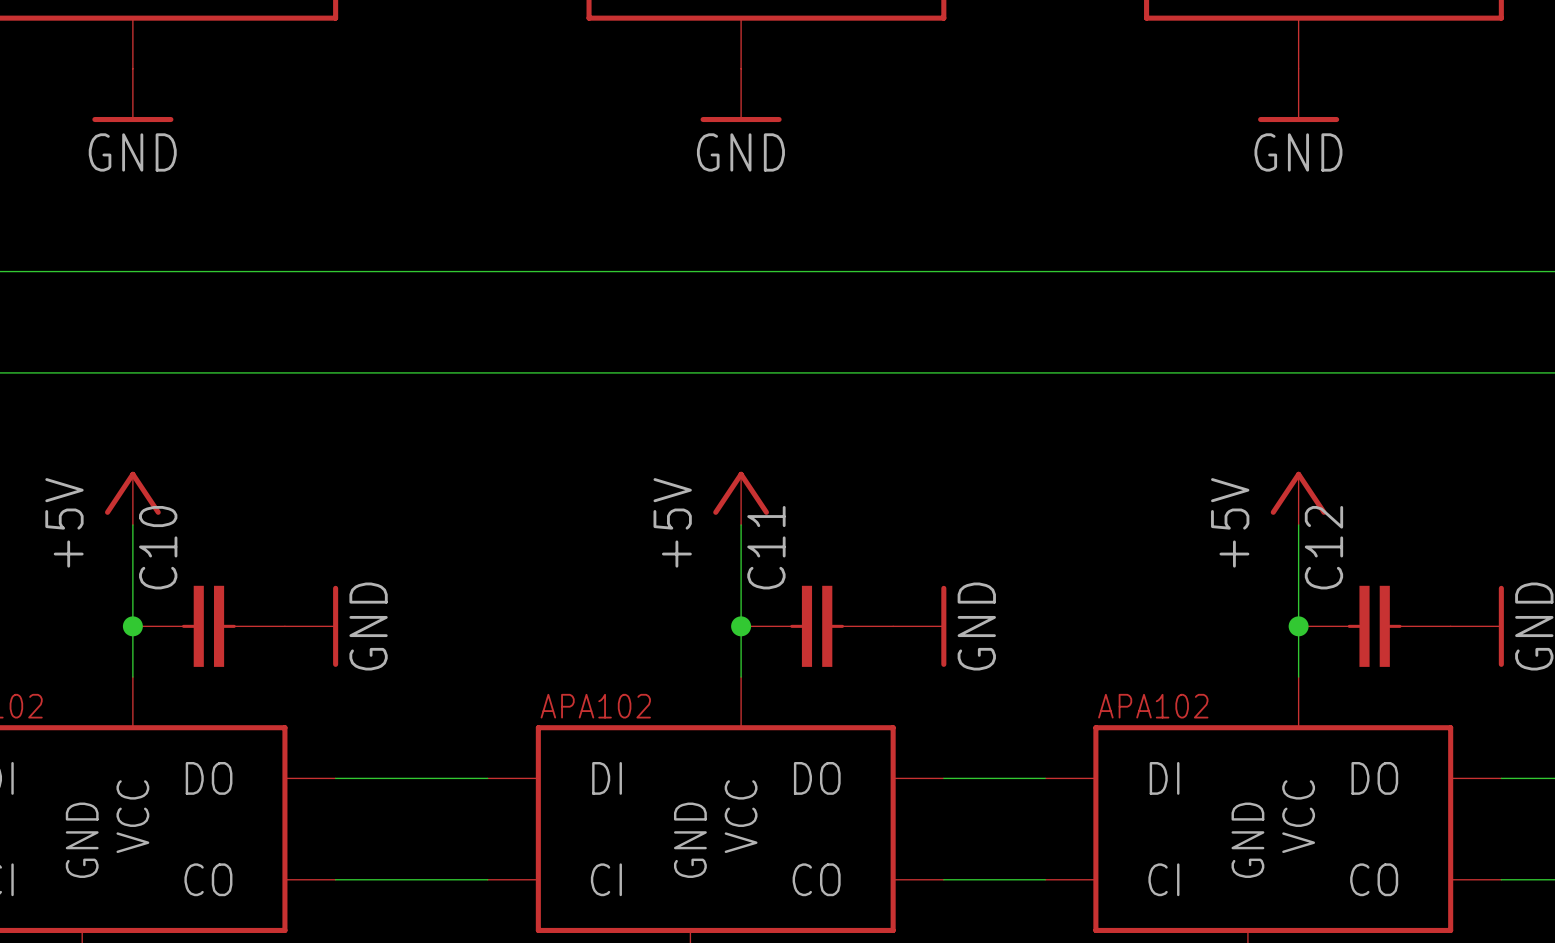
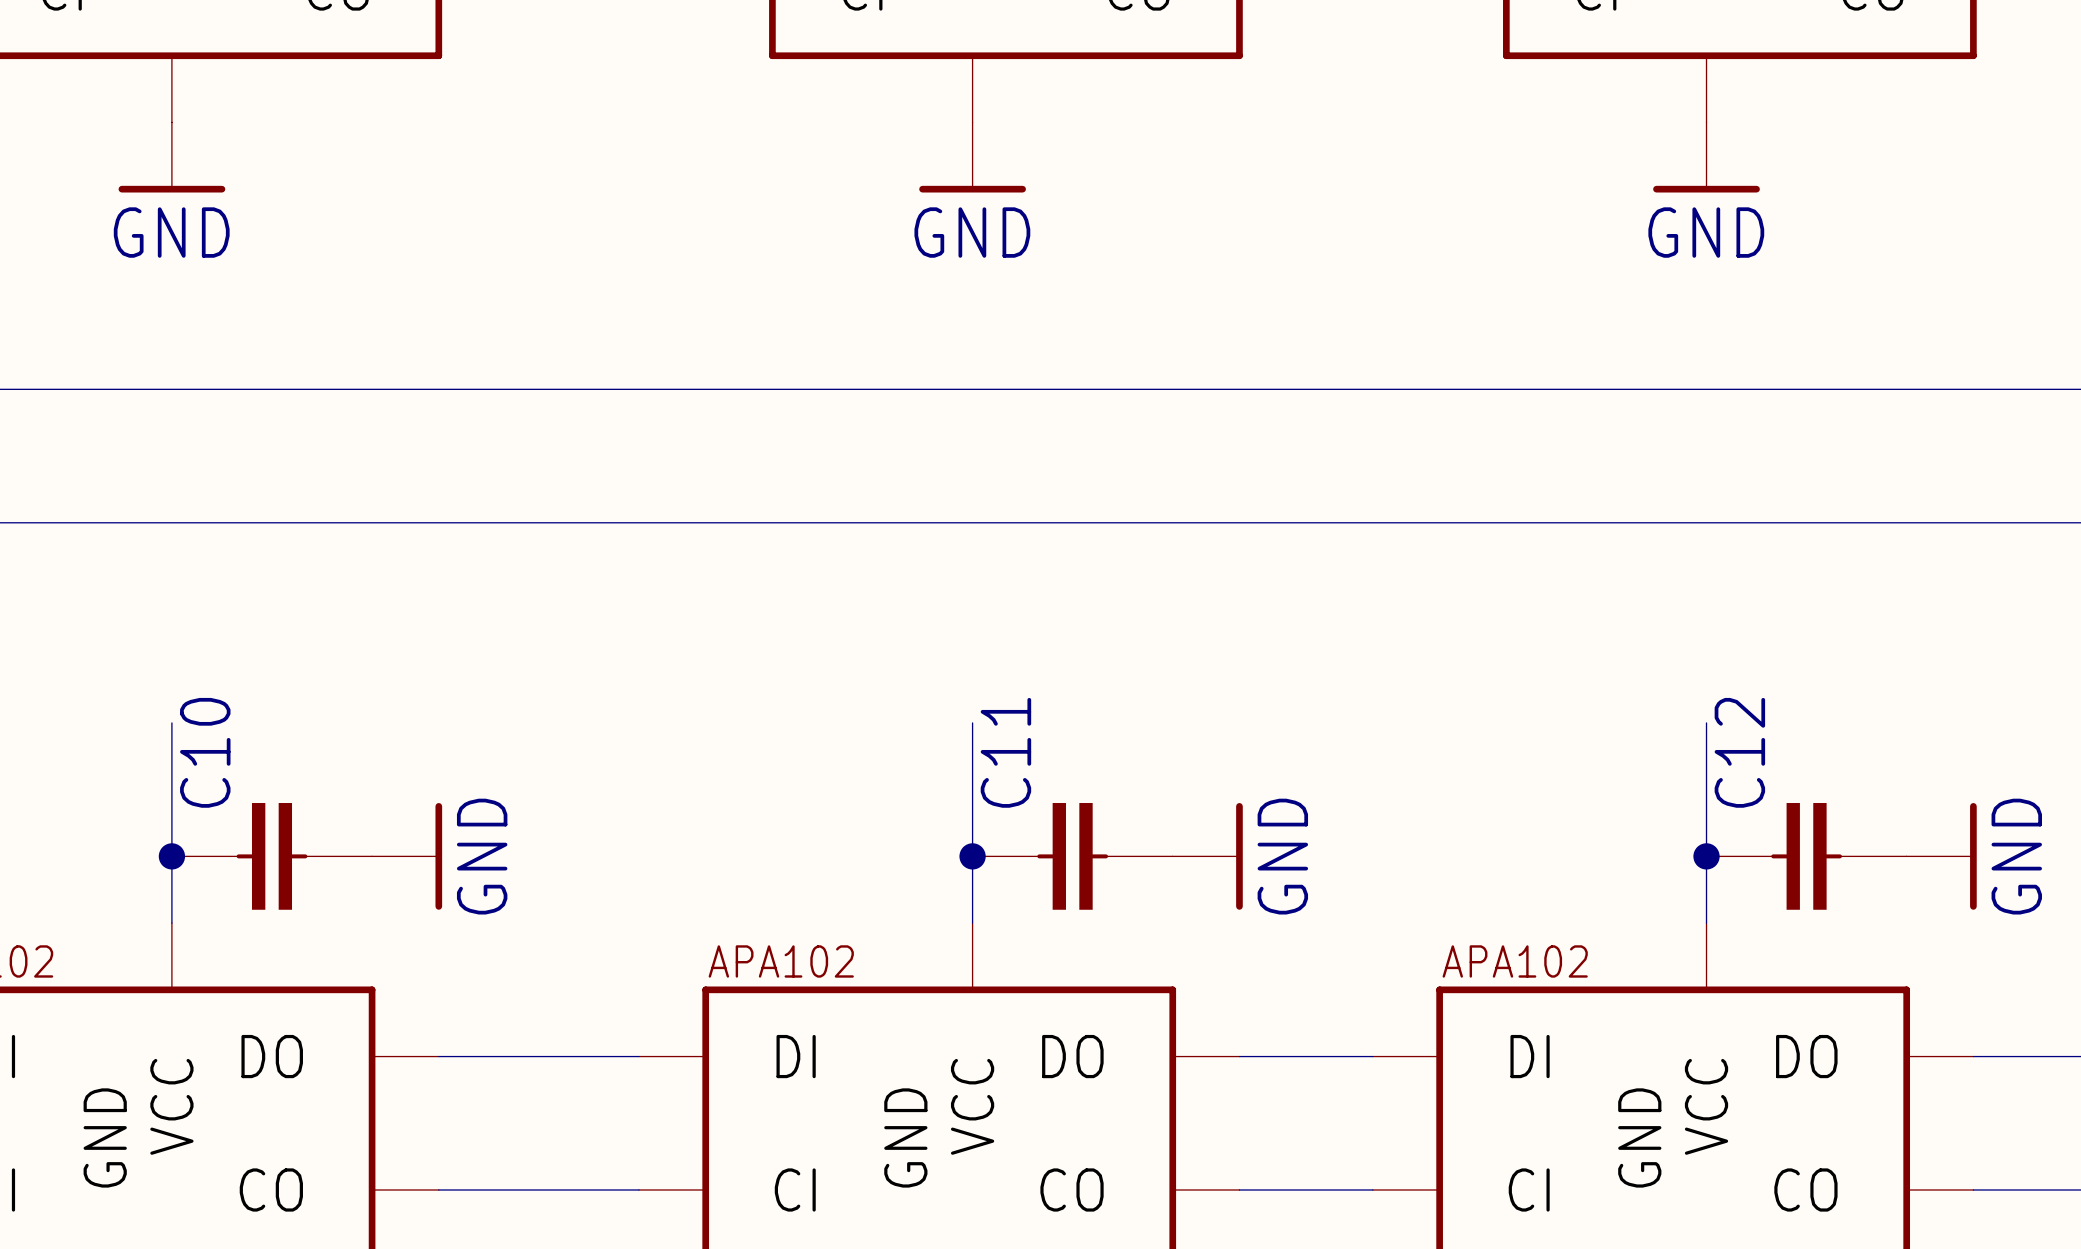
power symbol: +5V (132, 498) -> none
power symbol: +5V (741, 498) -> none
power symbol: +5V (1298, 498) -> none

